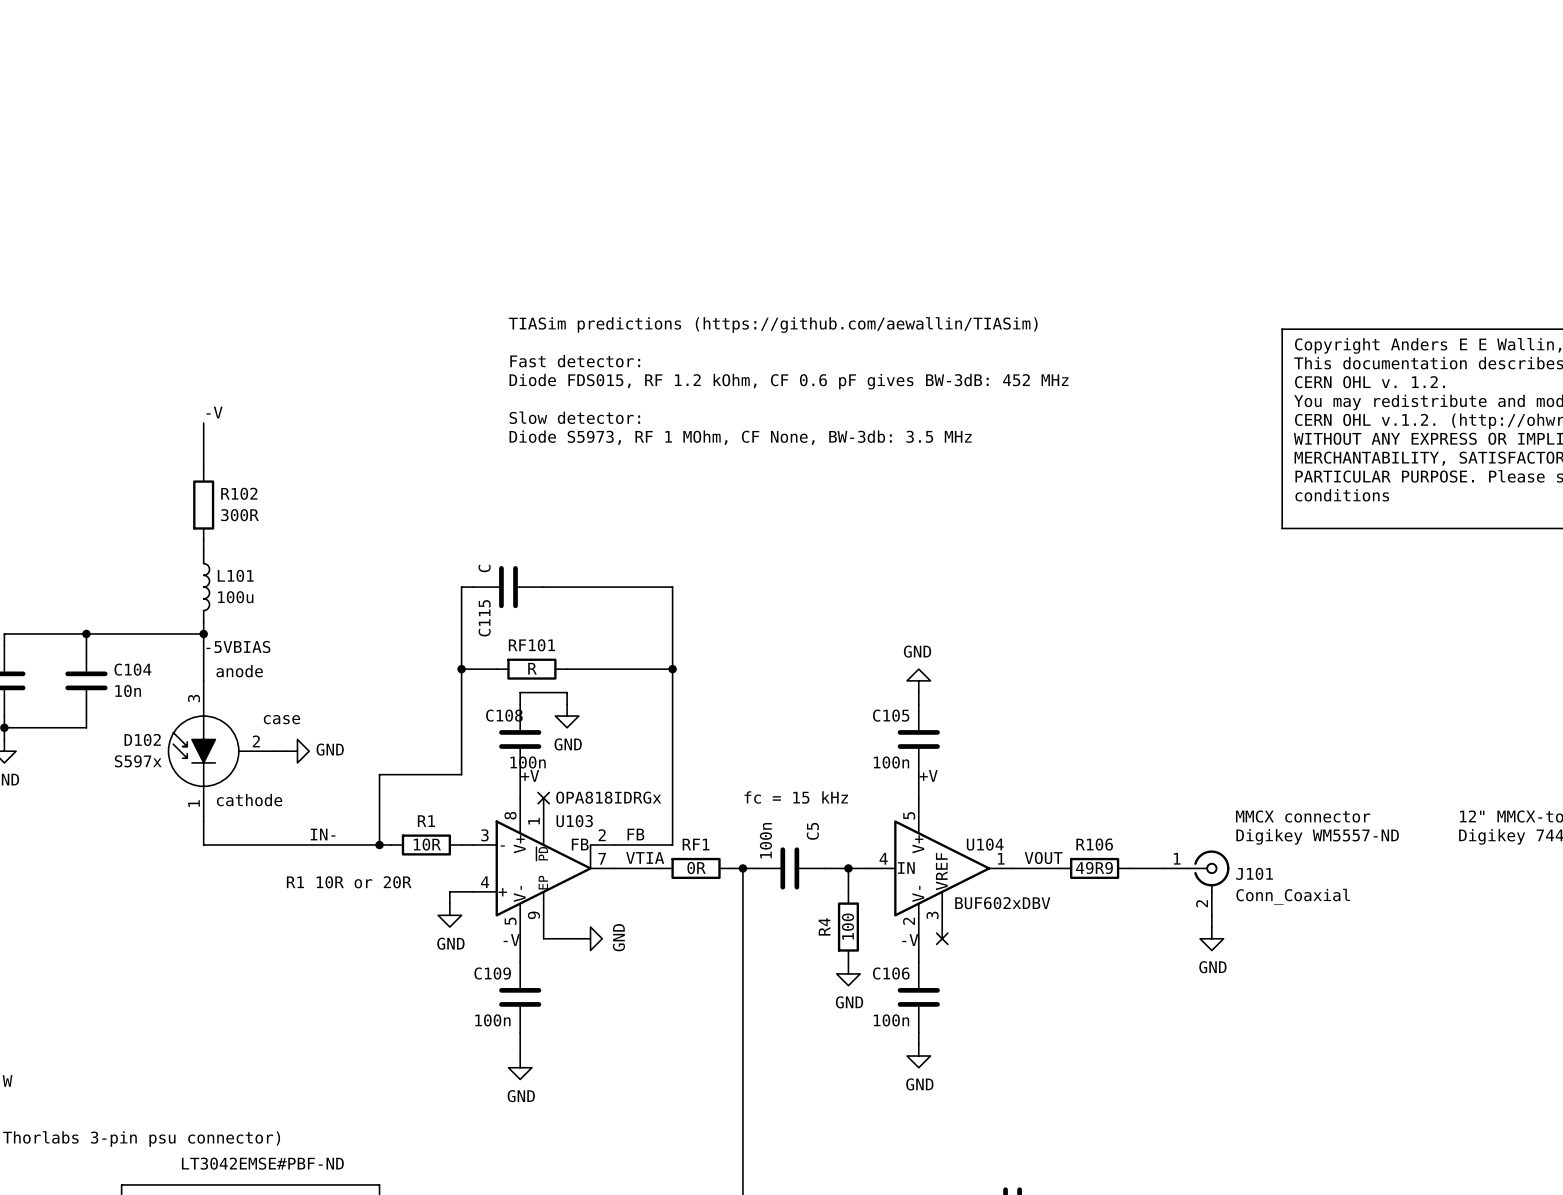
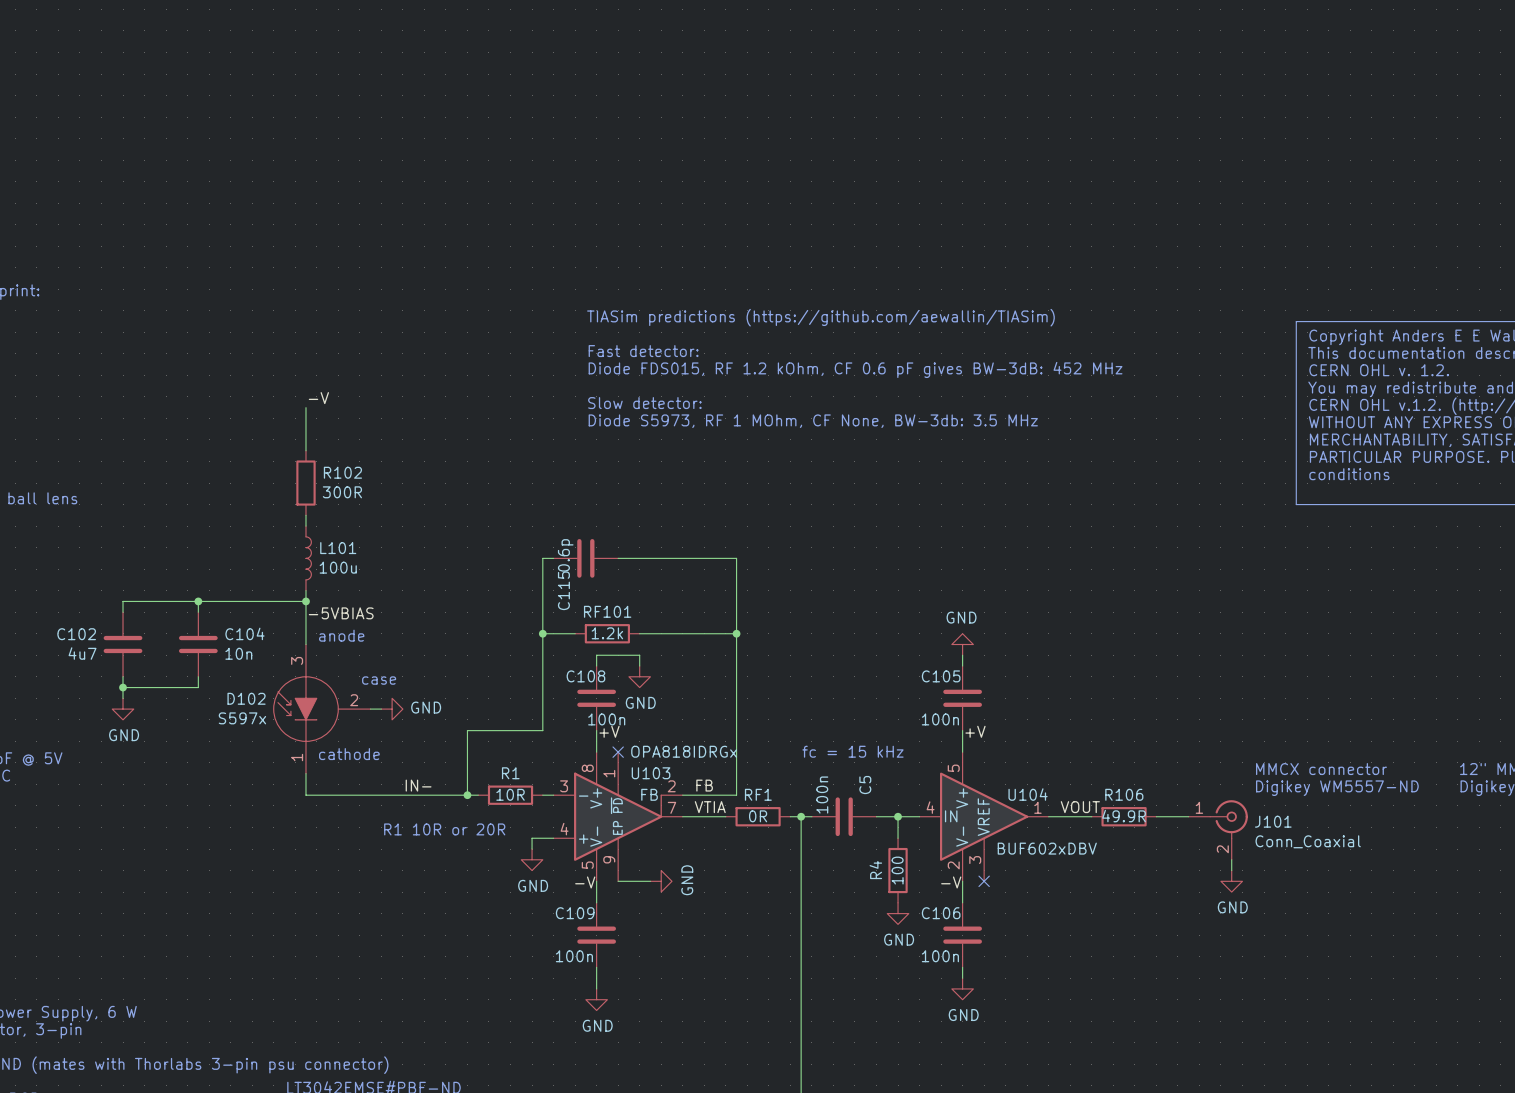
C115 value: C (484, 568) -> 0.6p (565, 555)
RF101 value: R (532, 668) -> 1.2k (607, 633)
R106 value: 49R9 (1094, 868) -> 49.9R (1124, 816)

